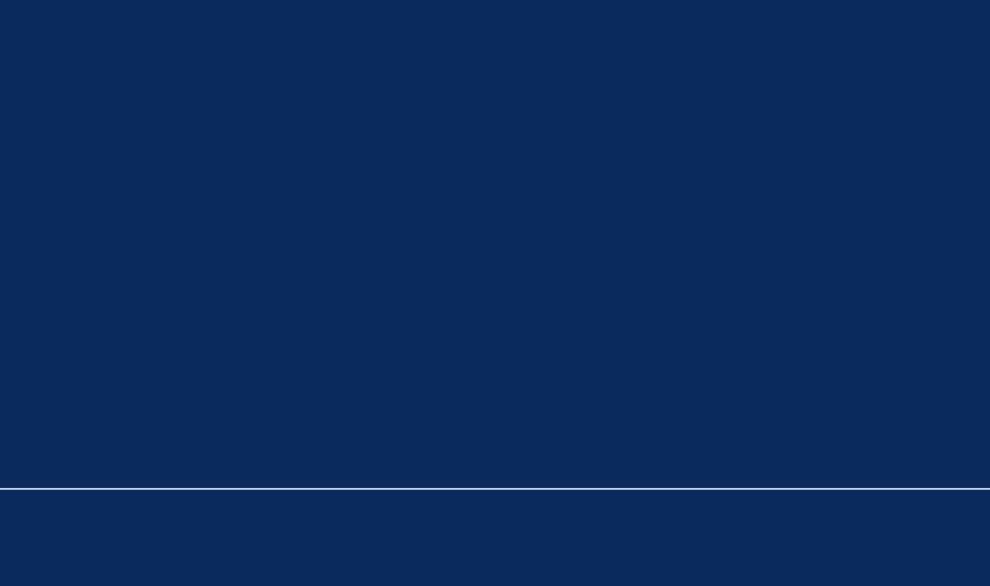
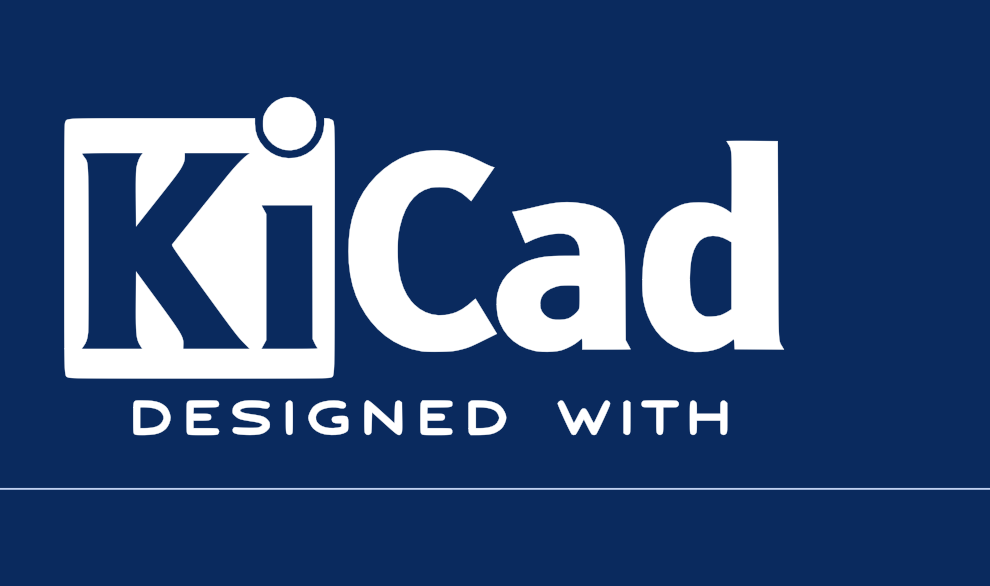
drawing: none -> [64, 96, 785, 436]

